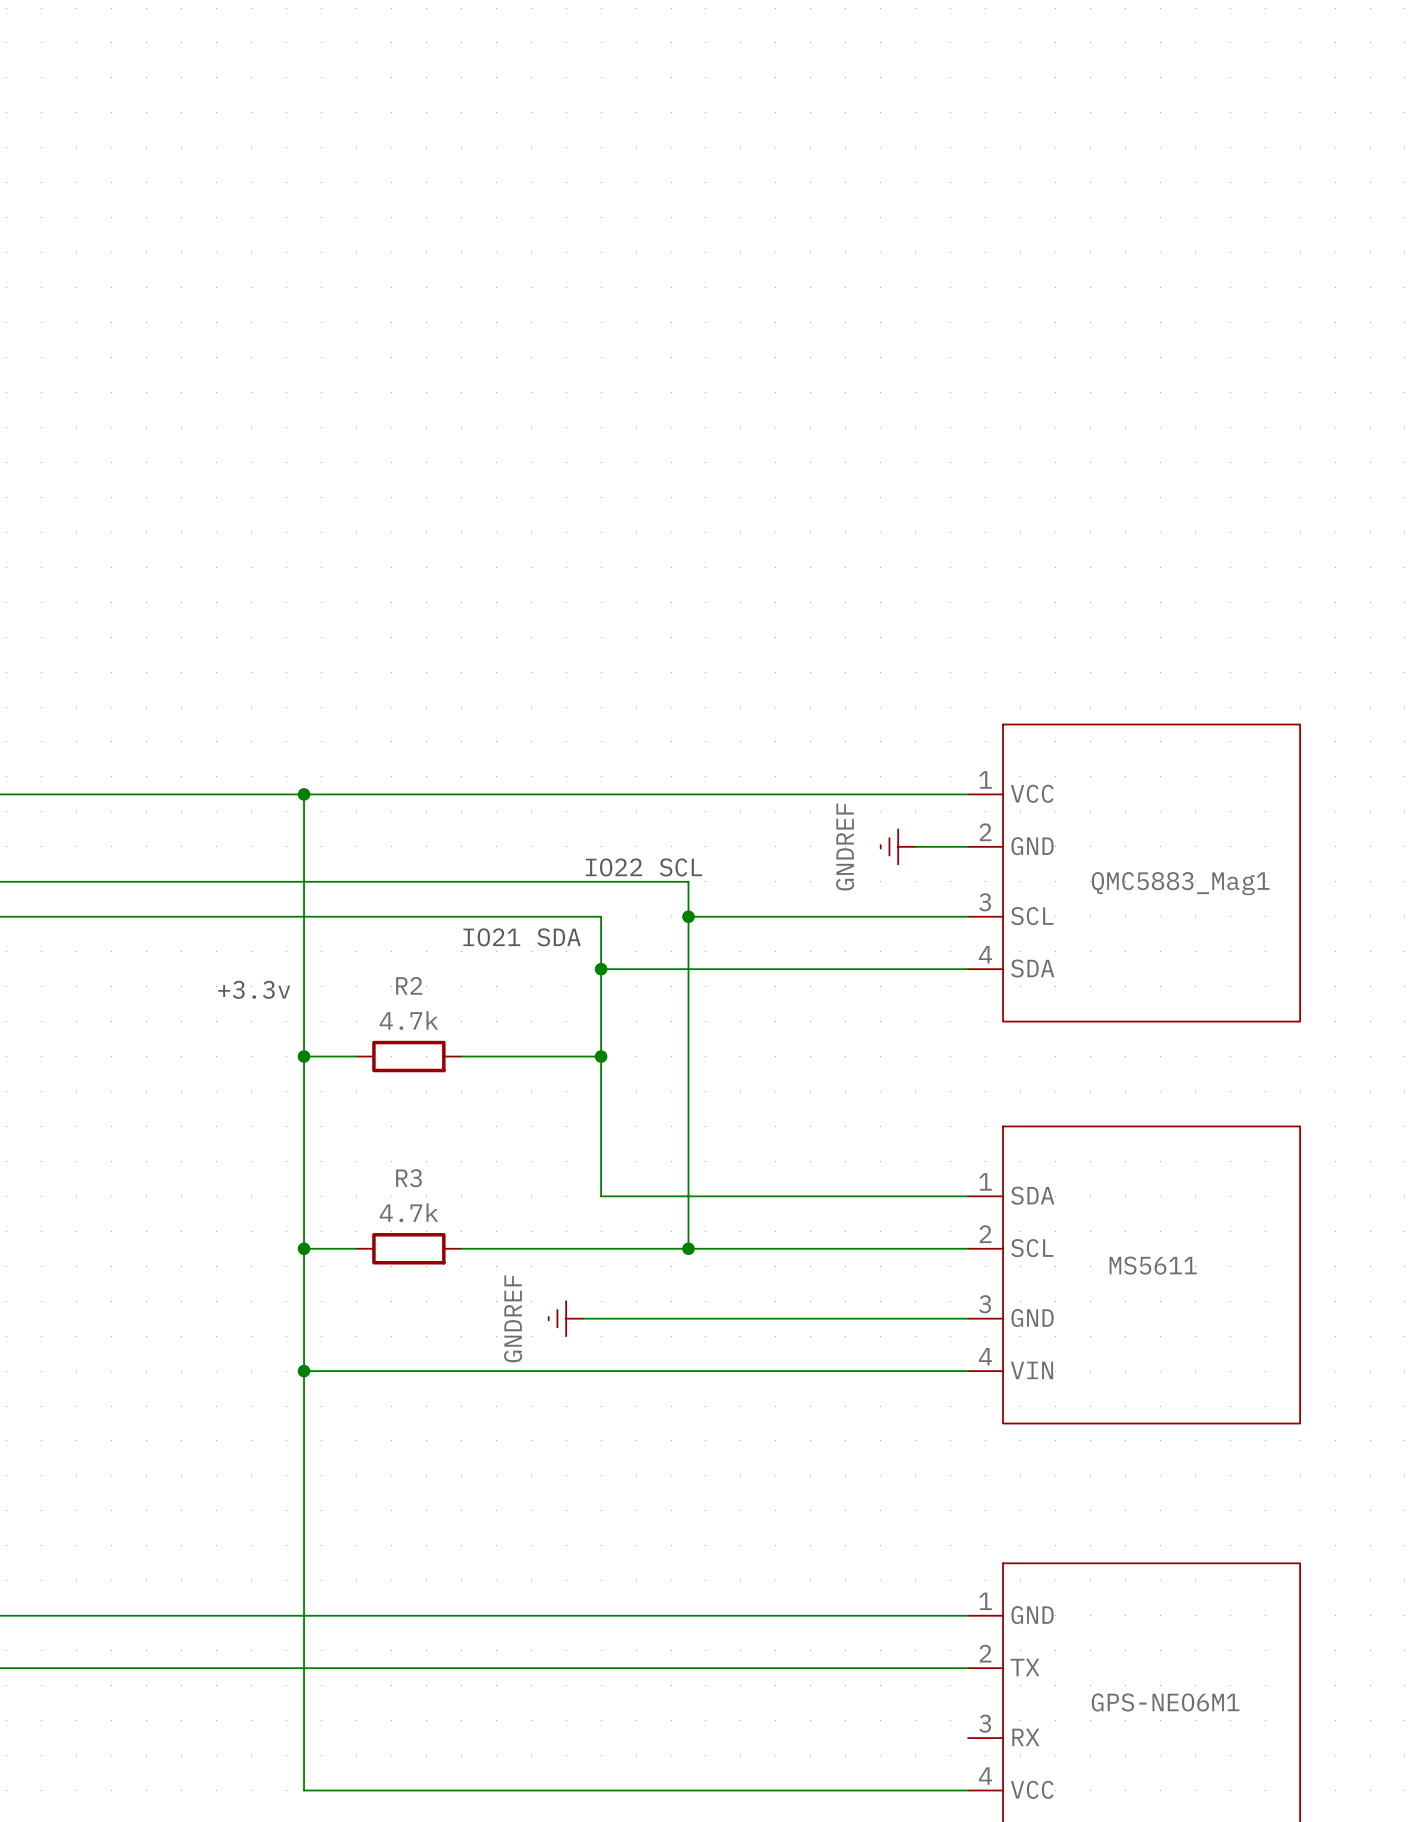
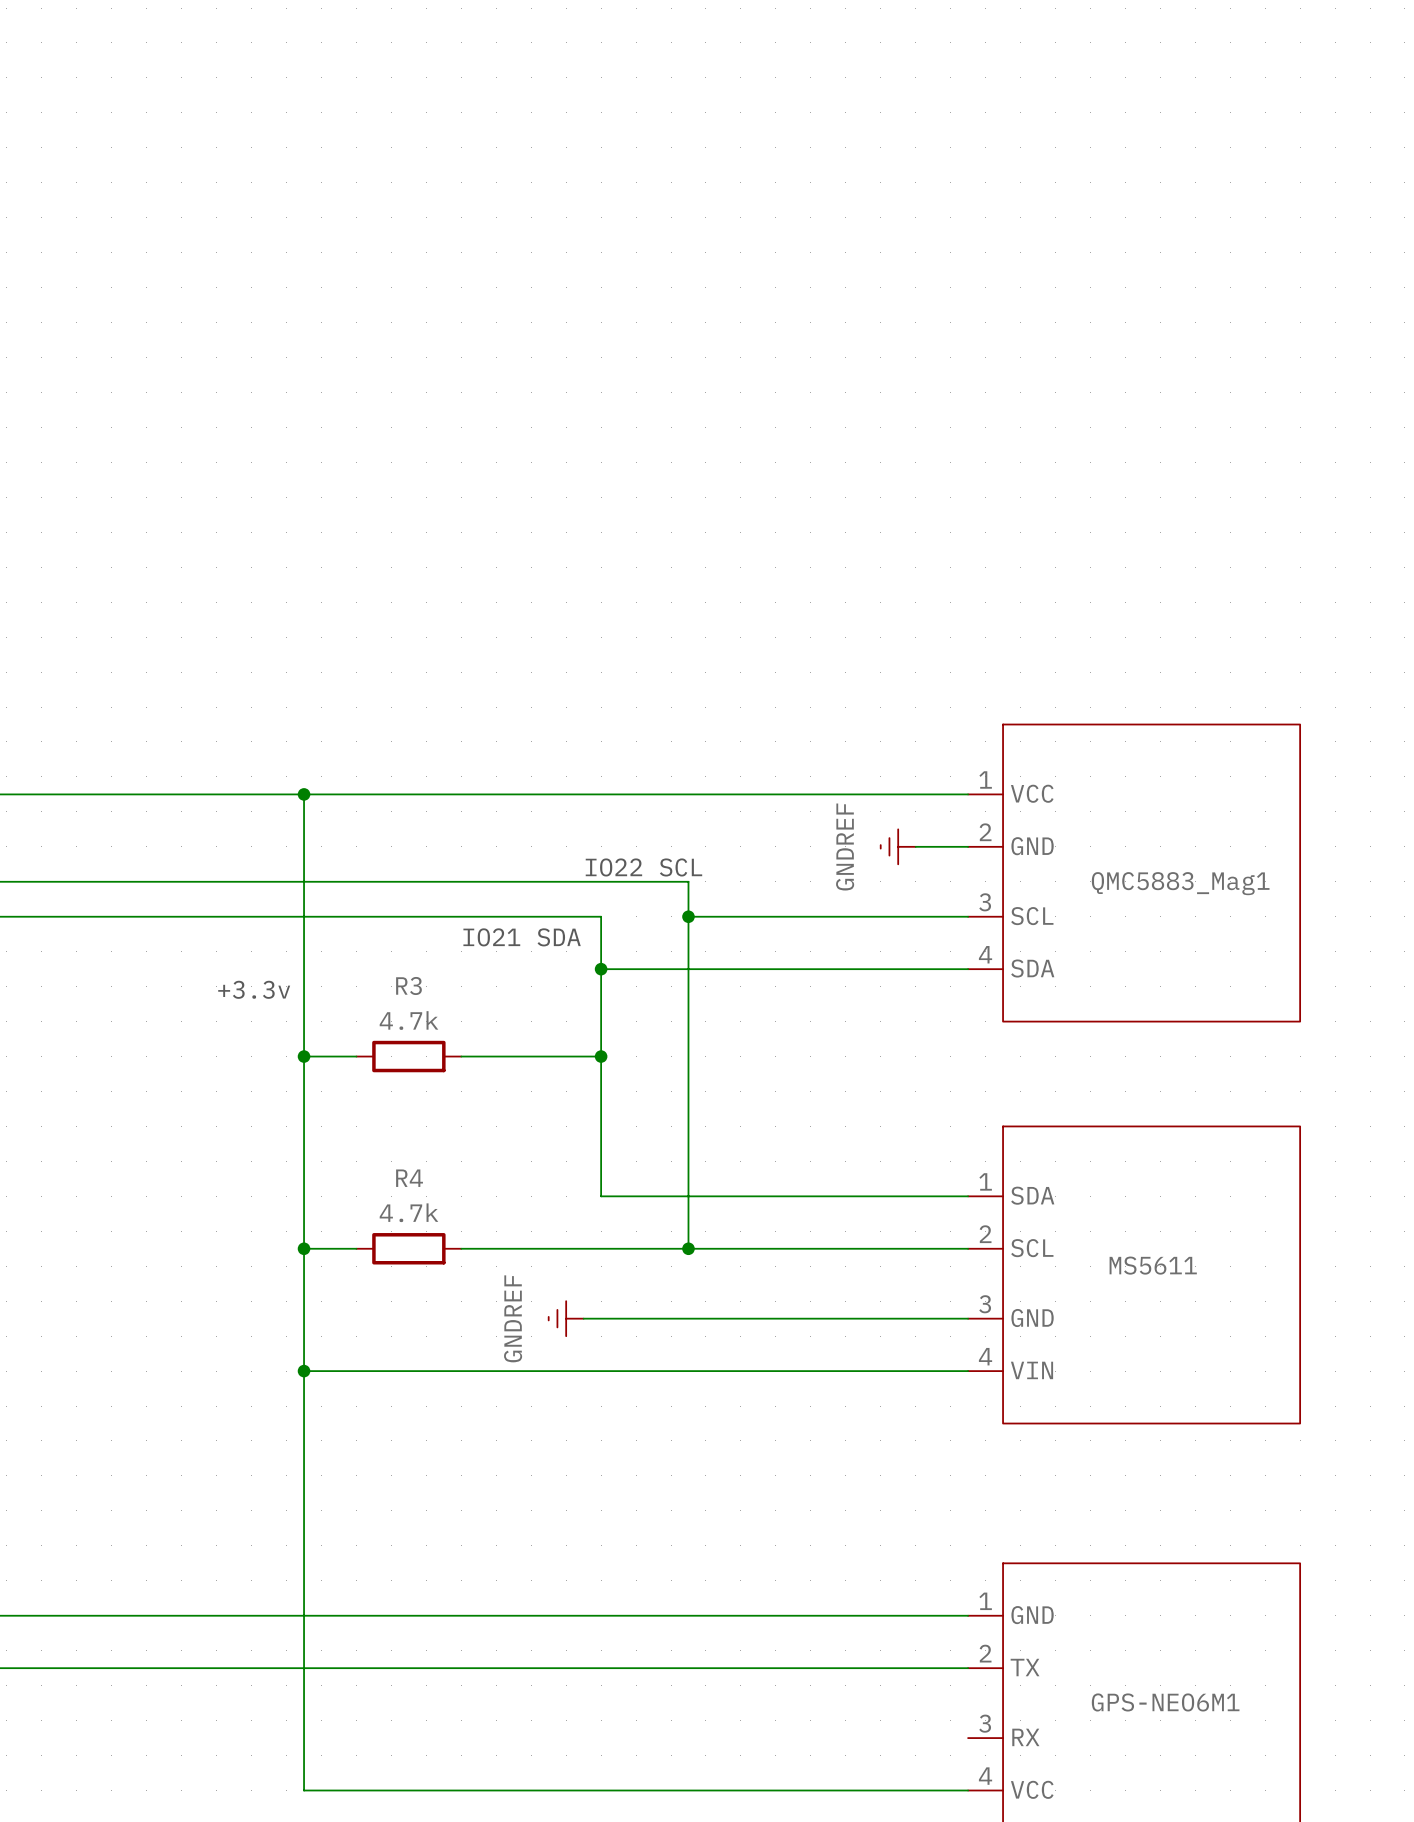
R2 name: R2 (409, 985) -> R3 (408, 985)
R3 name: R3 (408, 1178) -> R4 (409, 1178)

